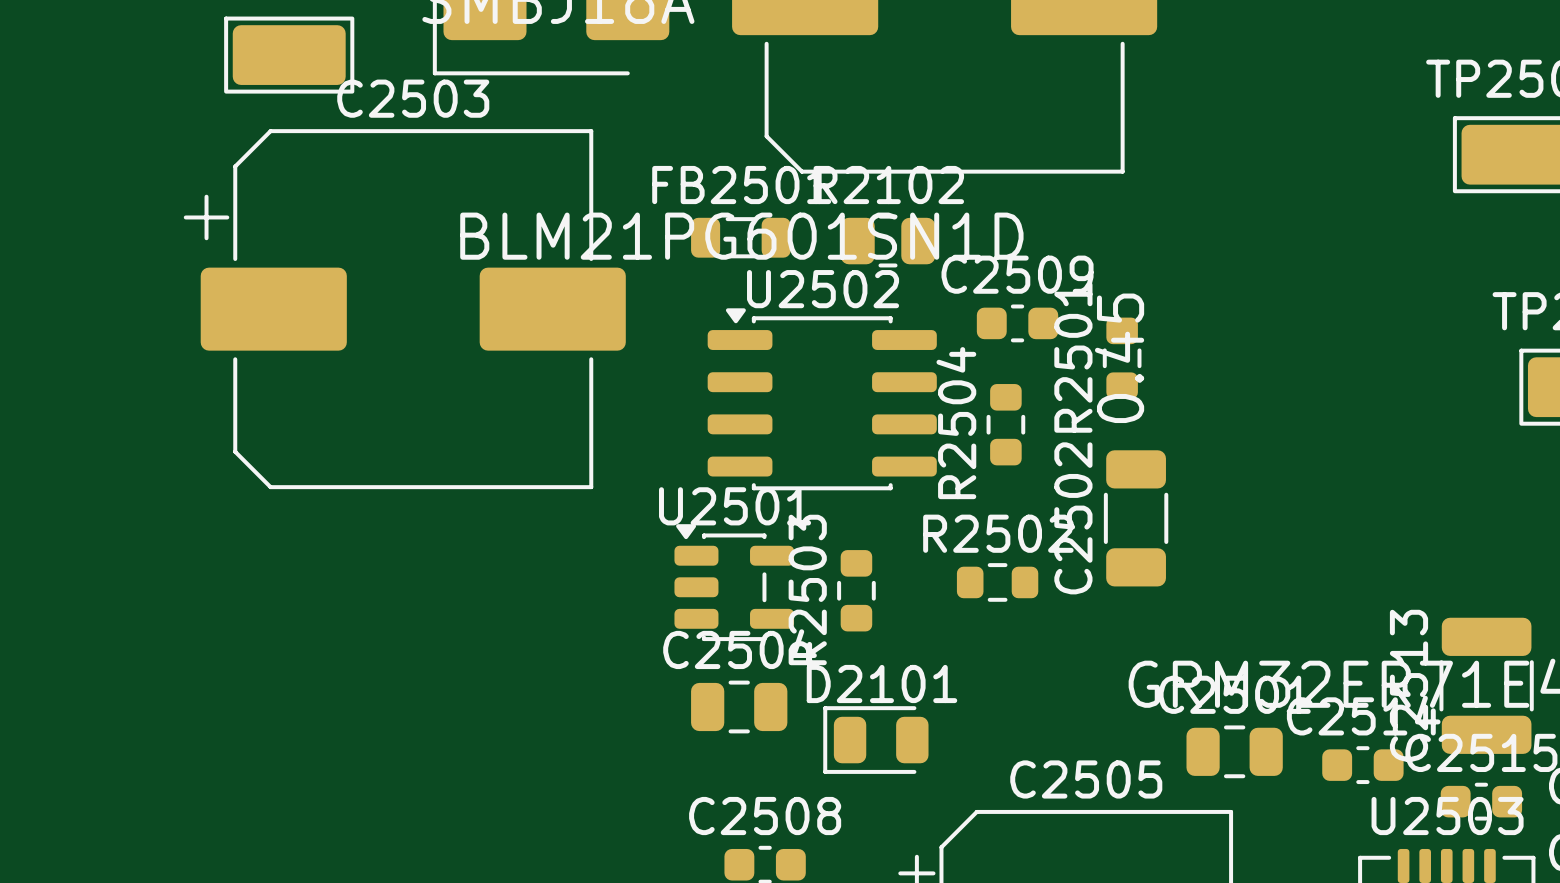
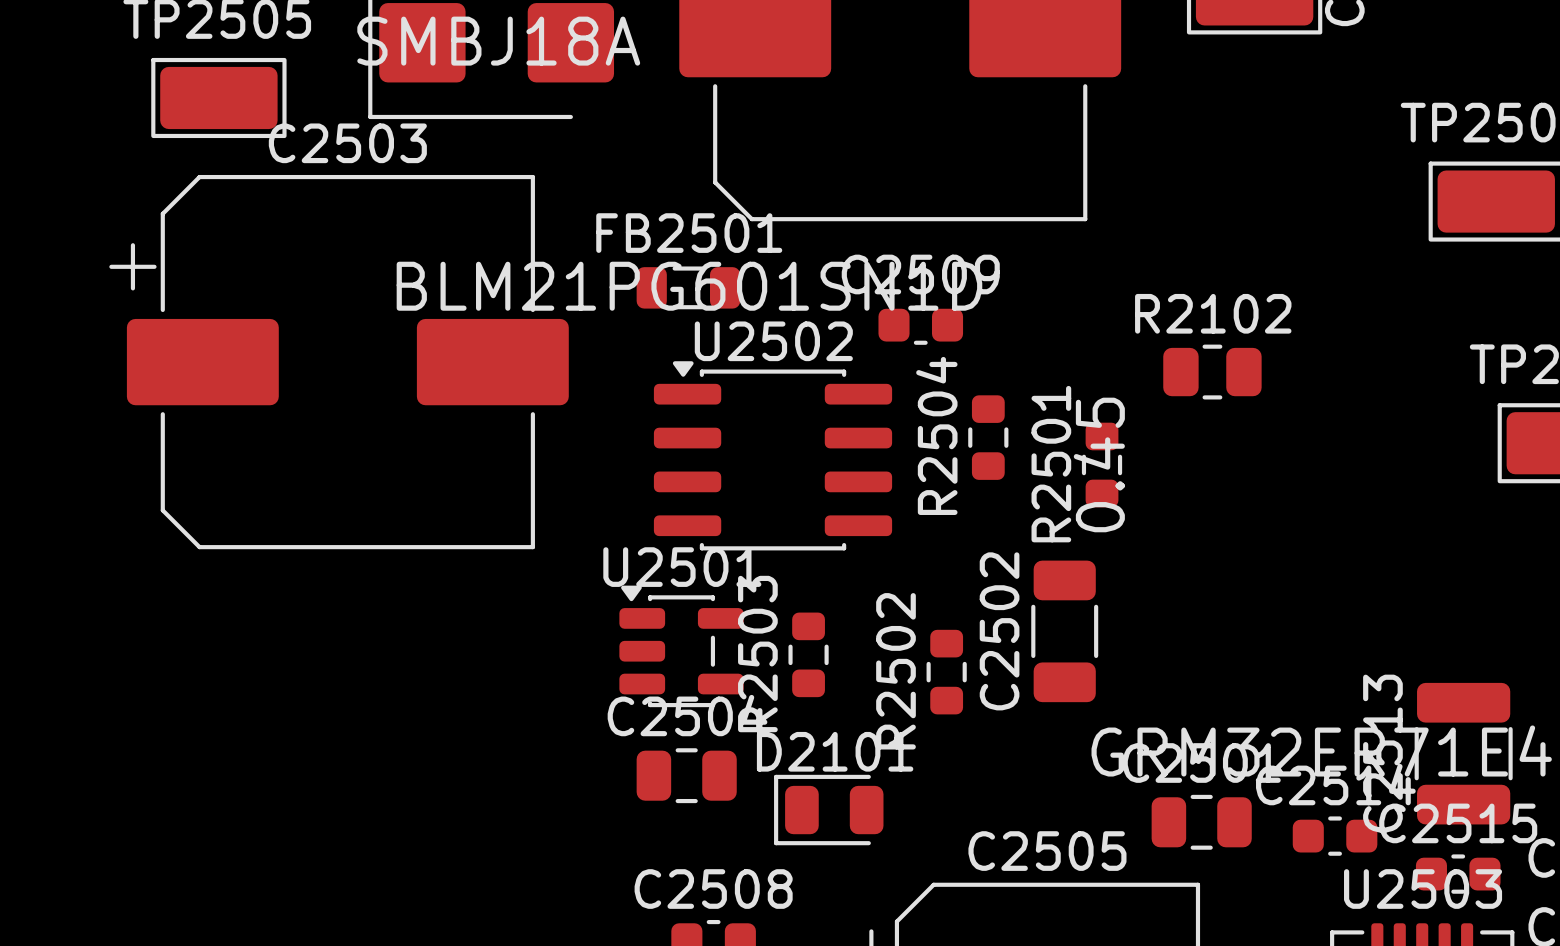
R2102 position: (888, 241) -> (1212, 372)
C2509 position: (1017, 323) -> (920, 325)
R2501 position: (1122, 358) -> (1102, 464)
R2504 position: (1005, 424) -> (988, 437)
C2502 position: (1136, 518) -> (1064, 631)
R2502 name position: R2502 (998, 533) -> R2502 (896, 671)
R2502 rotation: 0° (997, 582) -> 90° clockwise (946, 672)

